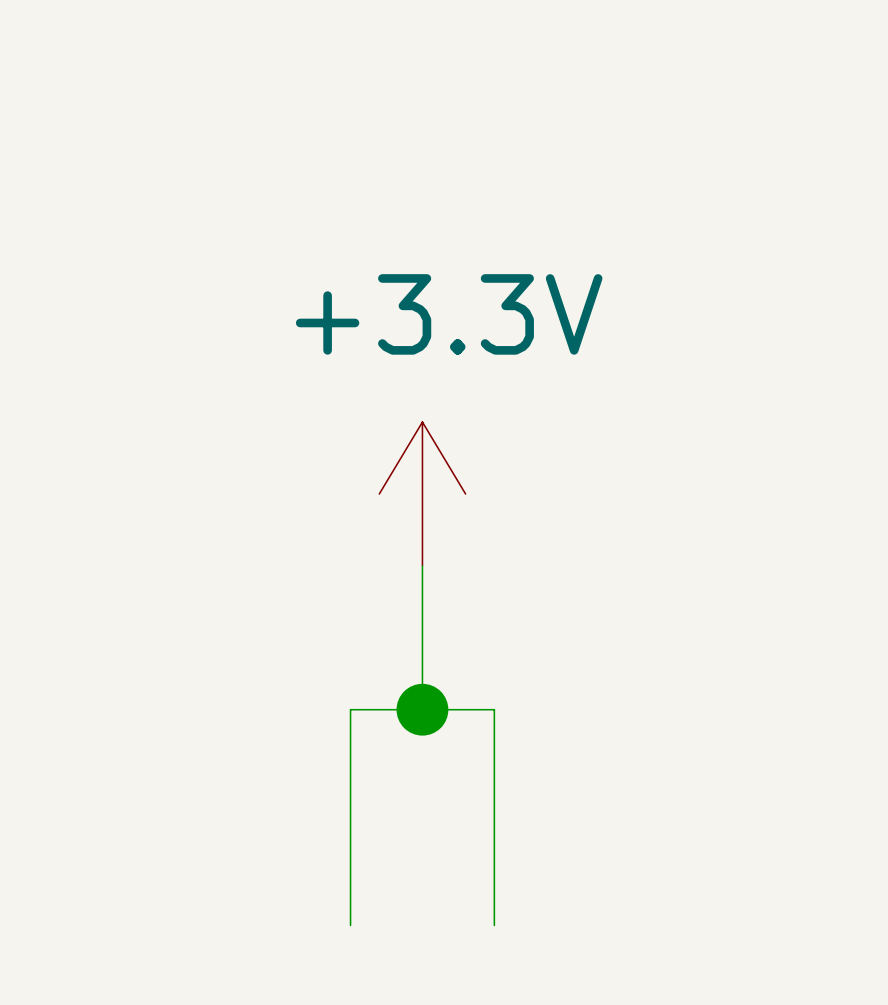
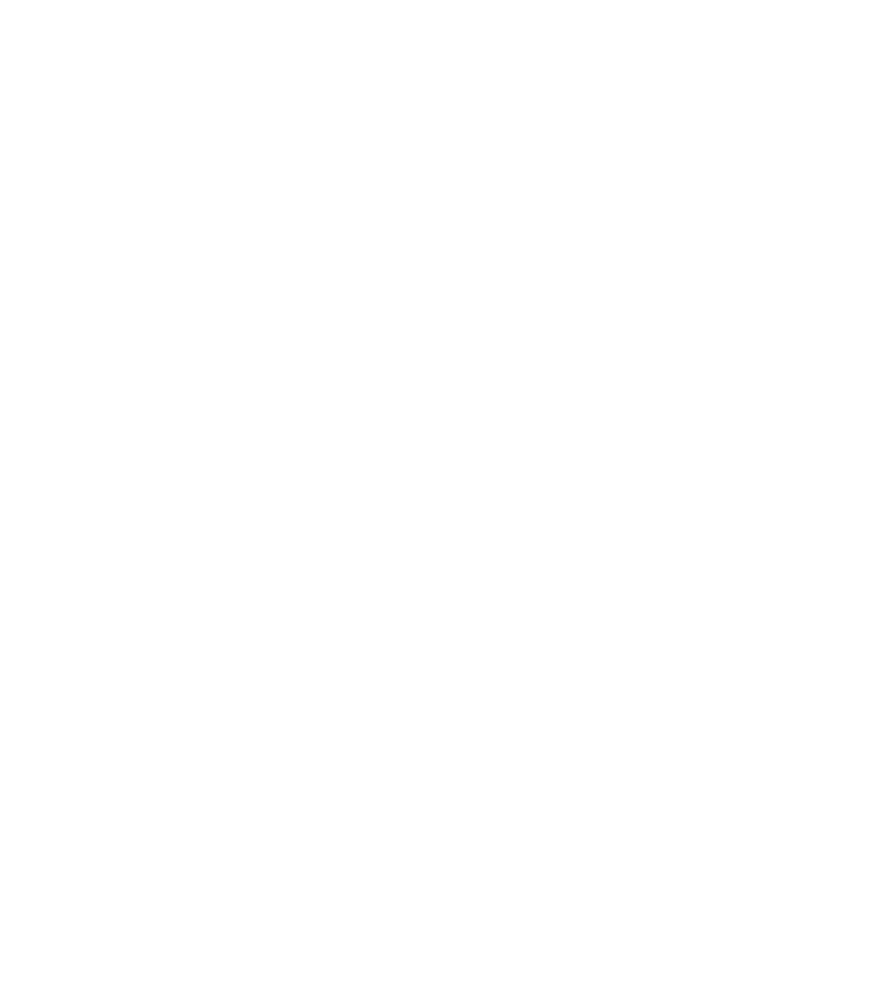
power symbol: +3.3V (422, 493) -> none
wire: (422, 565) (422, 709) -> none
junction: (422, 709) -> none
wire: (350, 925) (350, 709) (494, 709) (494, 925) -> none

